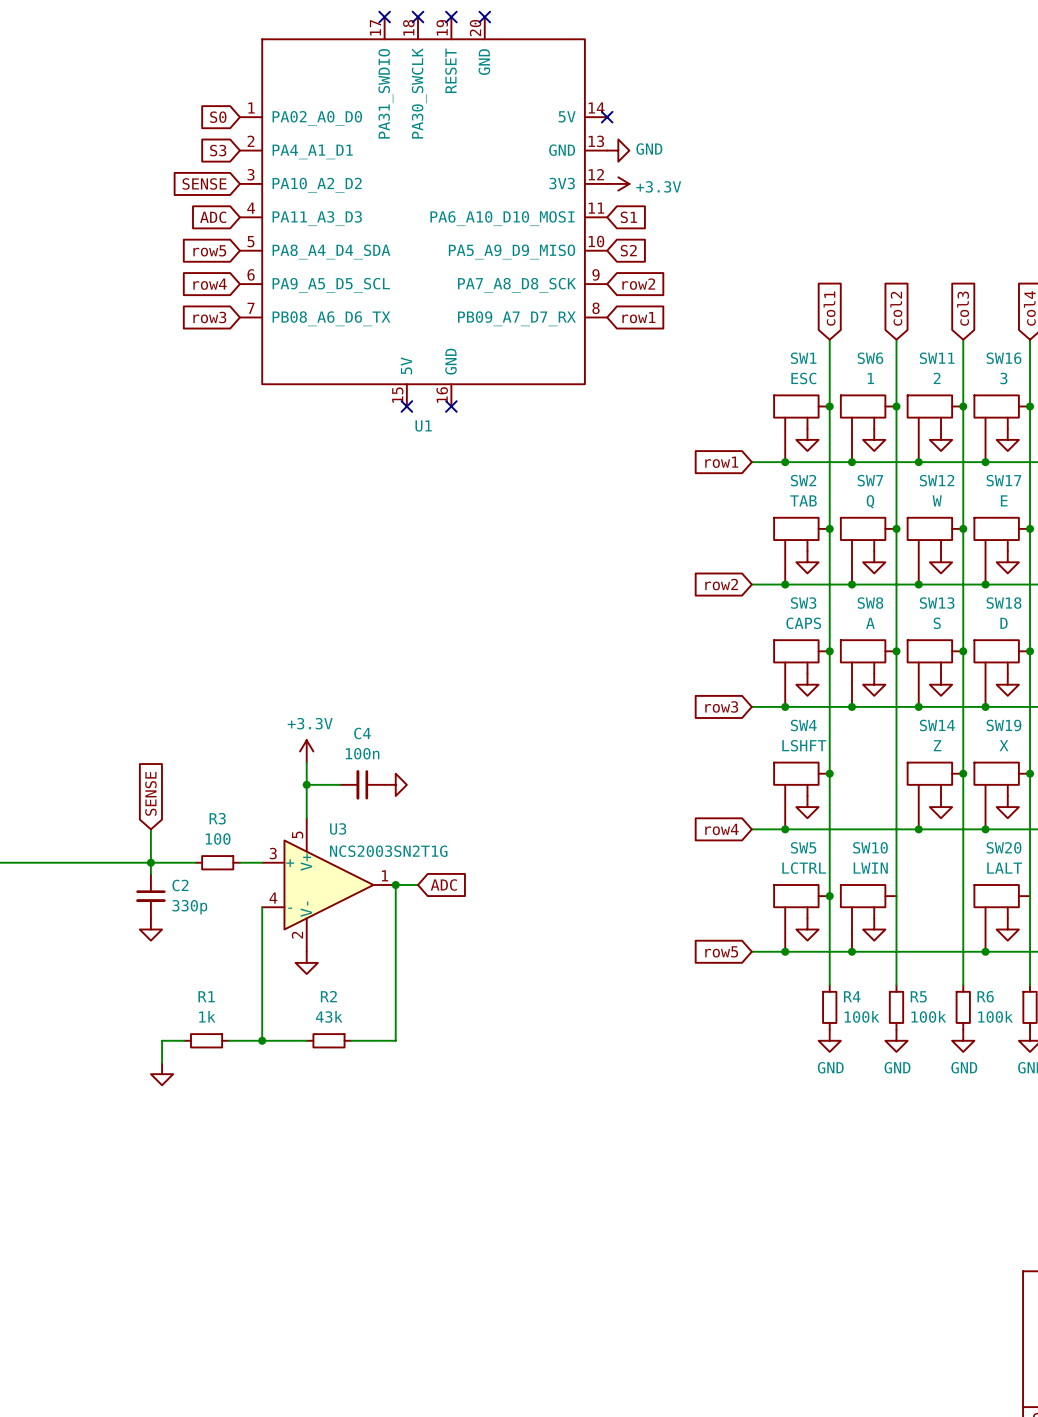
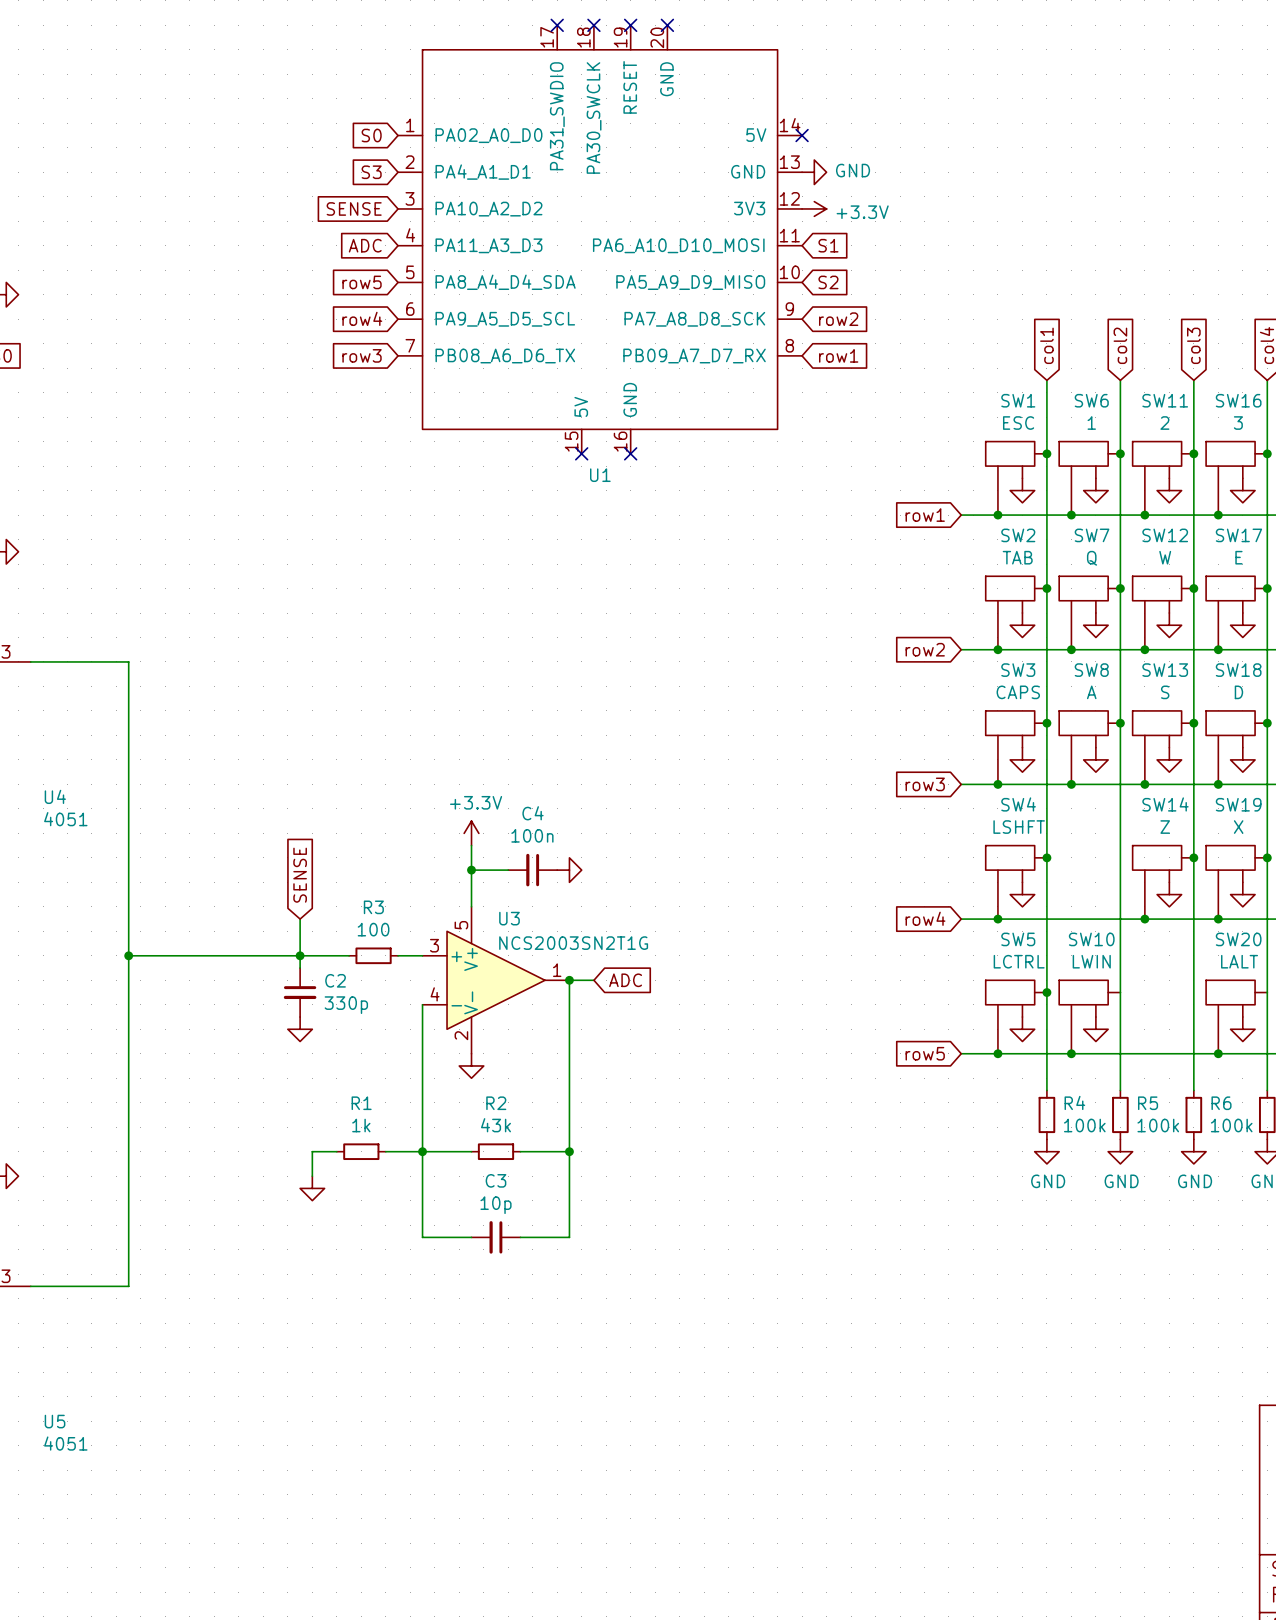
wire: none -> (422, 1151) (422, 1237) (471, 1237)
wire: none -> (569, 1151) (569, 1237) (520, 1237)
junction: none -> (569, 1151)
C3: none -> 10p (495, 1237)

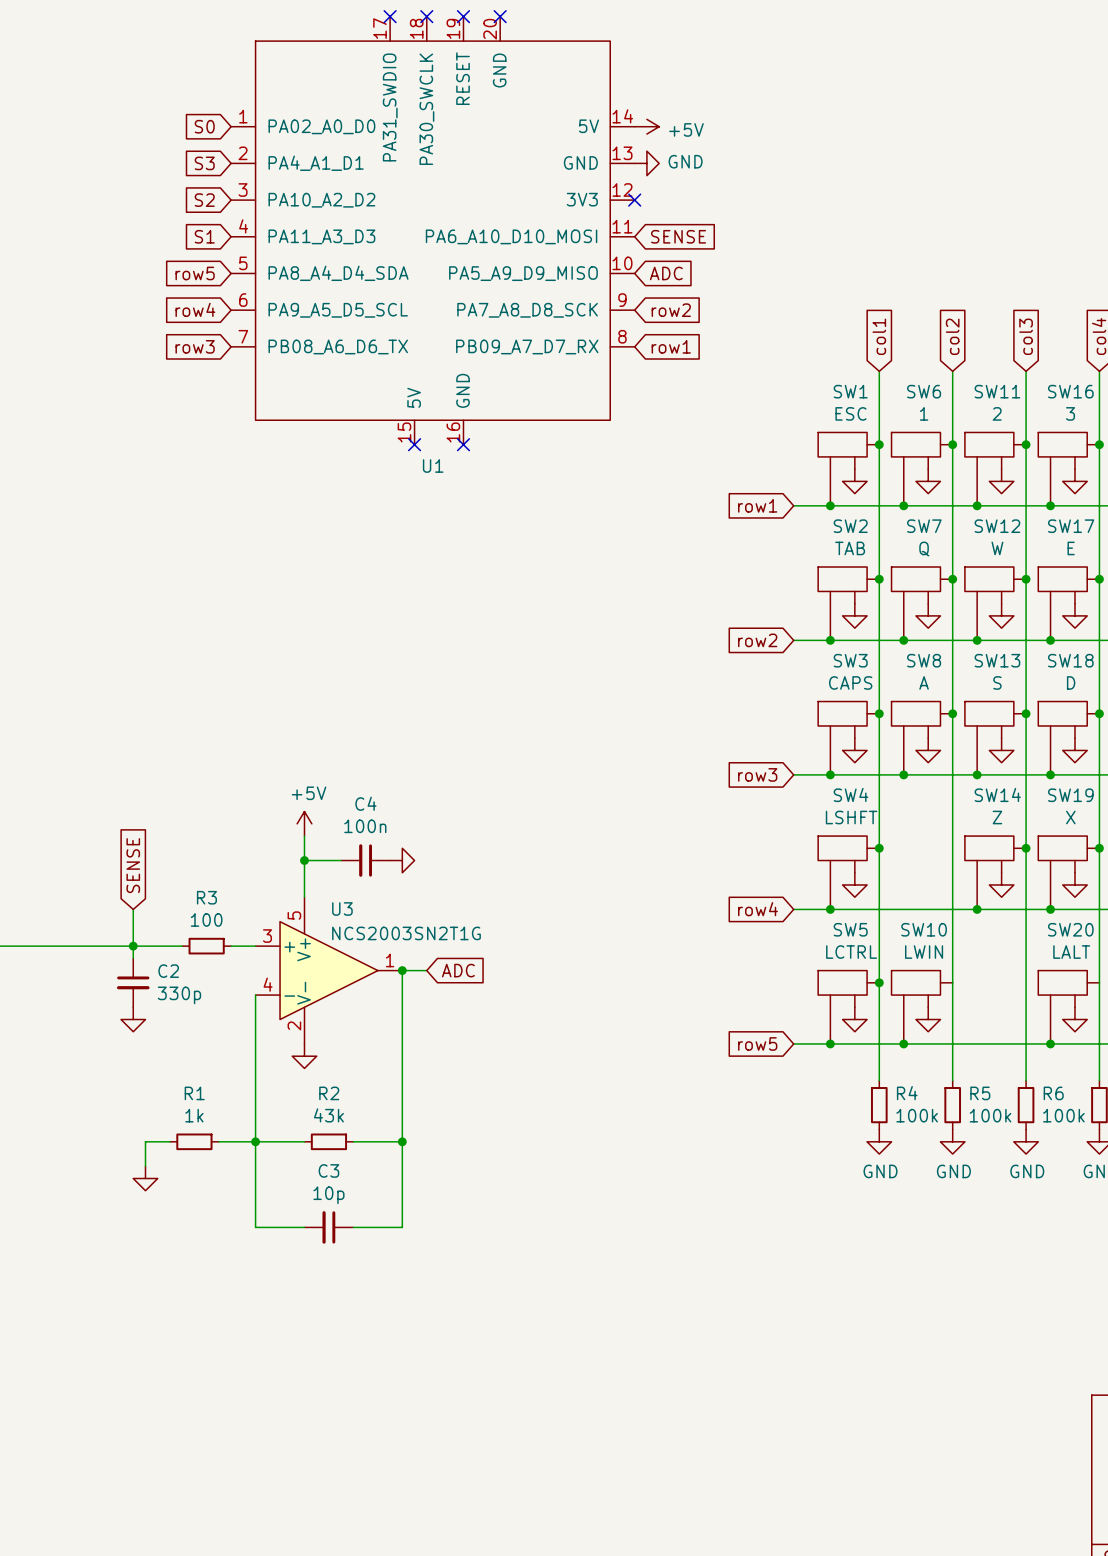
no-connect mark: (802, 135) -> none
power symbol: none -> +5V (646, 126)
global label: SENSE (354, 208) -> S2 (204, 200)
no-connect mark: none -> (634, 200)
power symbol: +3.3V (814, 208) -> none
global label: ADC (365, 245) -> S1 (204, 236)
global label: S1 (828, 245) -> SENSE (678, 236)
global label: S2 (828, 282) -> ADC (666, 273)
power symbol: +3.3V (471, 833) -> +5V (304, 823)

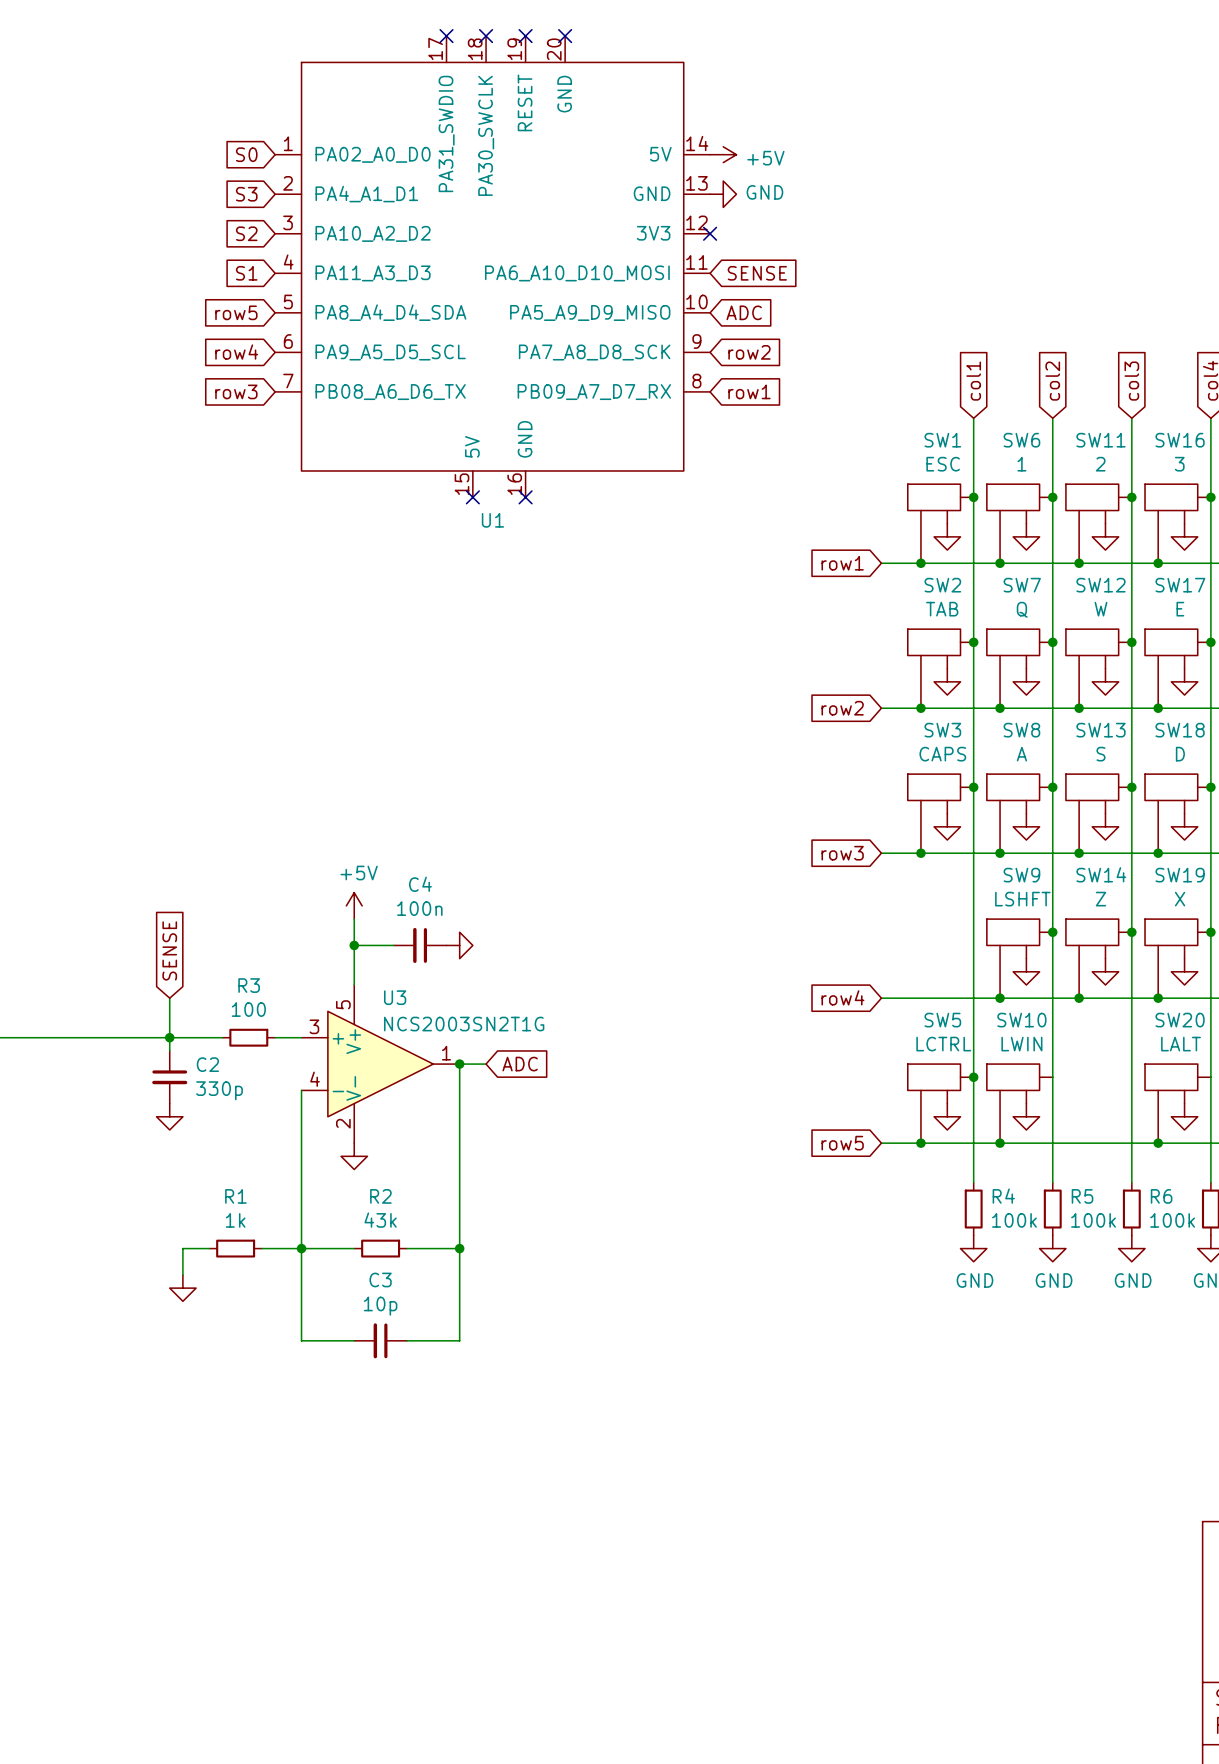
junction: (879, 848) -> none
junction: none -> (1052, 932)
SW4: LSHFT (848, 872) -> none
SW9: none -> LSHFT (1019, 958)
power symbol position: (854, 884) -> (1026, 971)
junction: (830, 909) -> none
junction: none -> (1000, 998)

